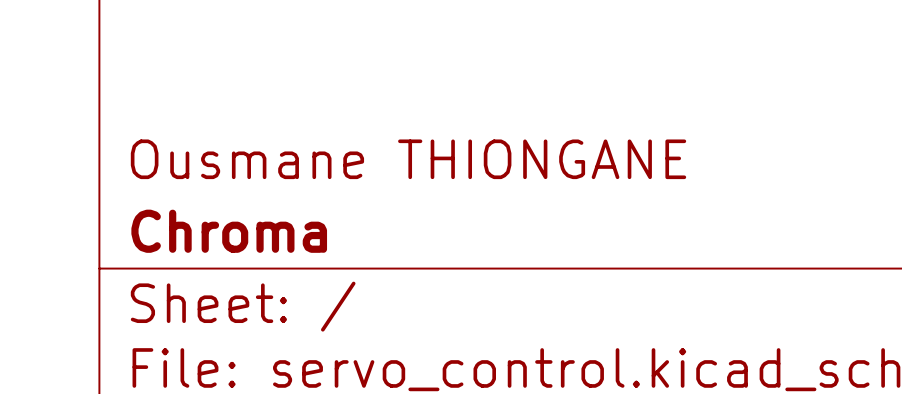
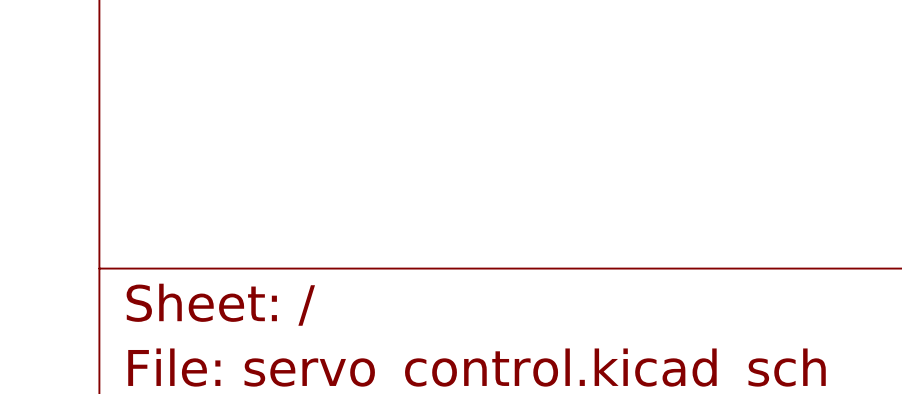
title block: Ousmane THIONGANE (408, 159) -> none
title block: Chroma (229, 231) -> none

